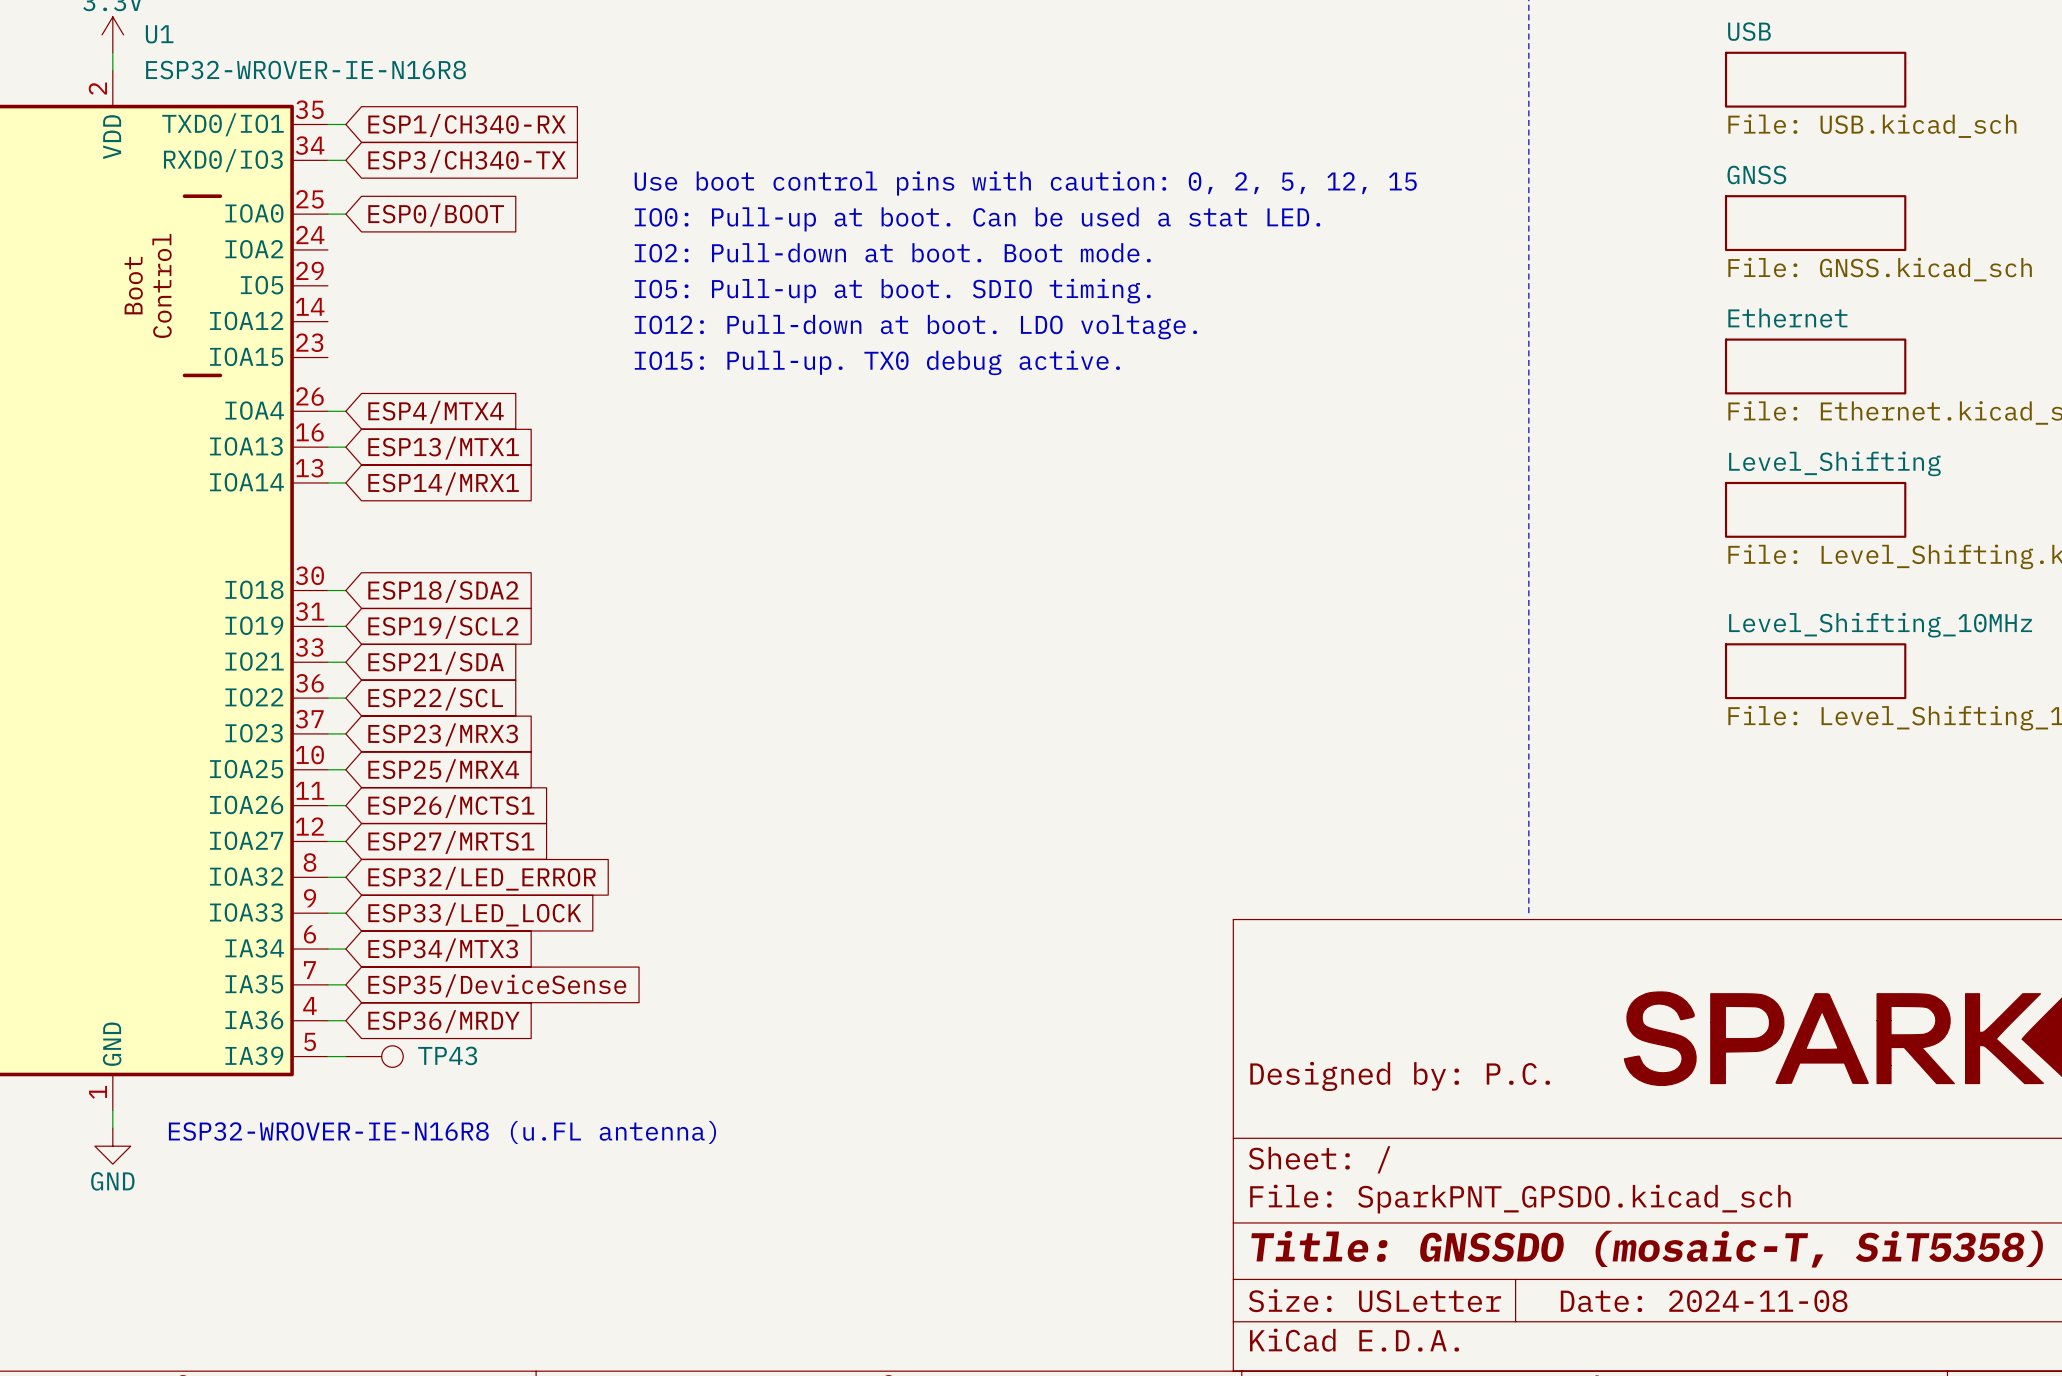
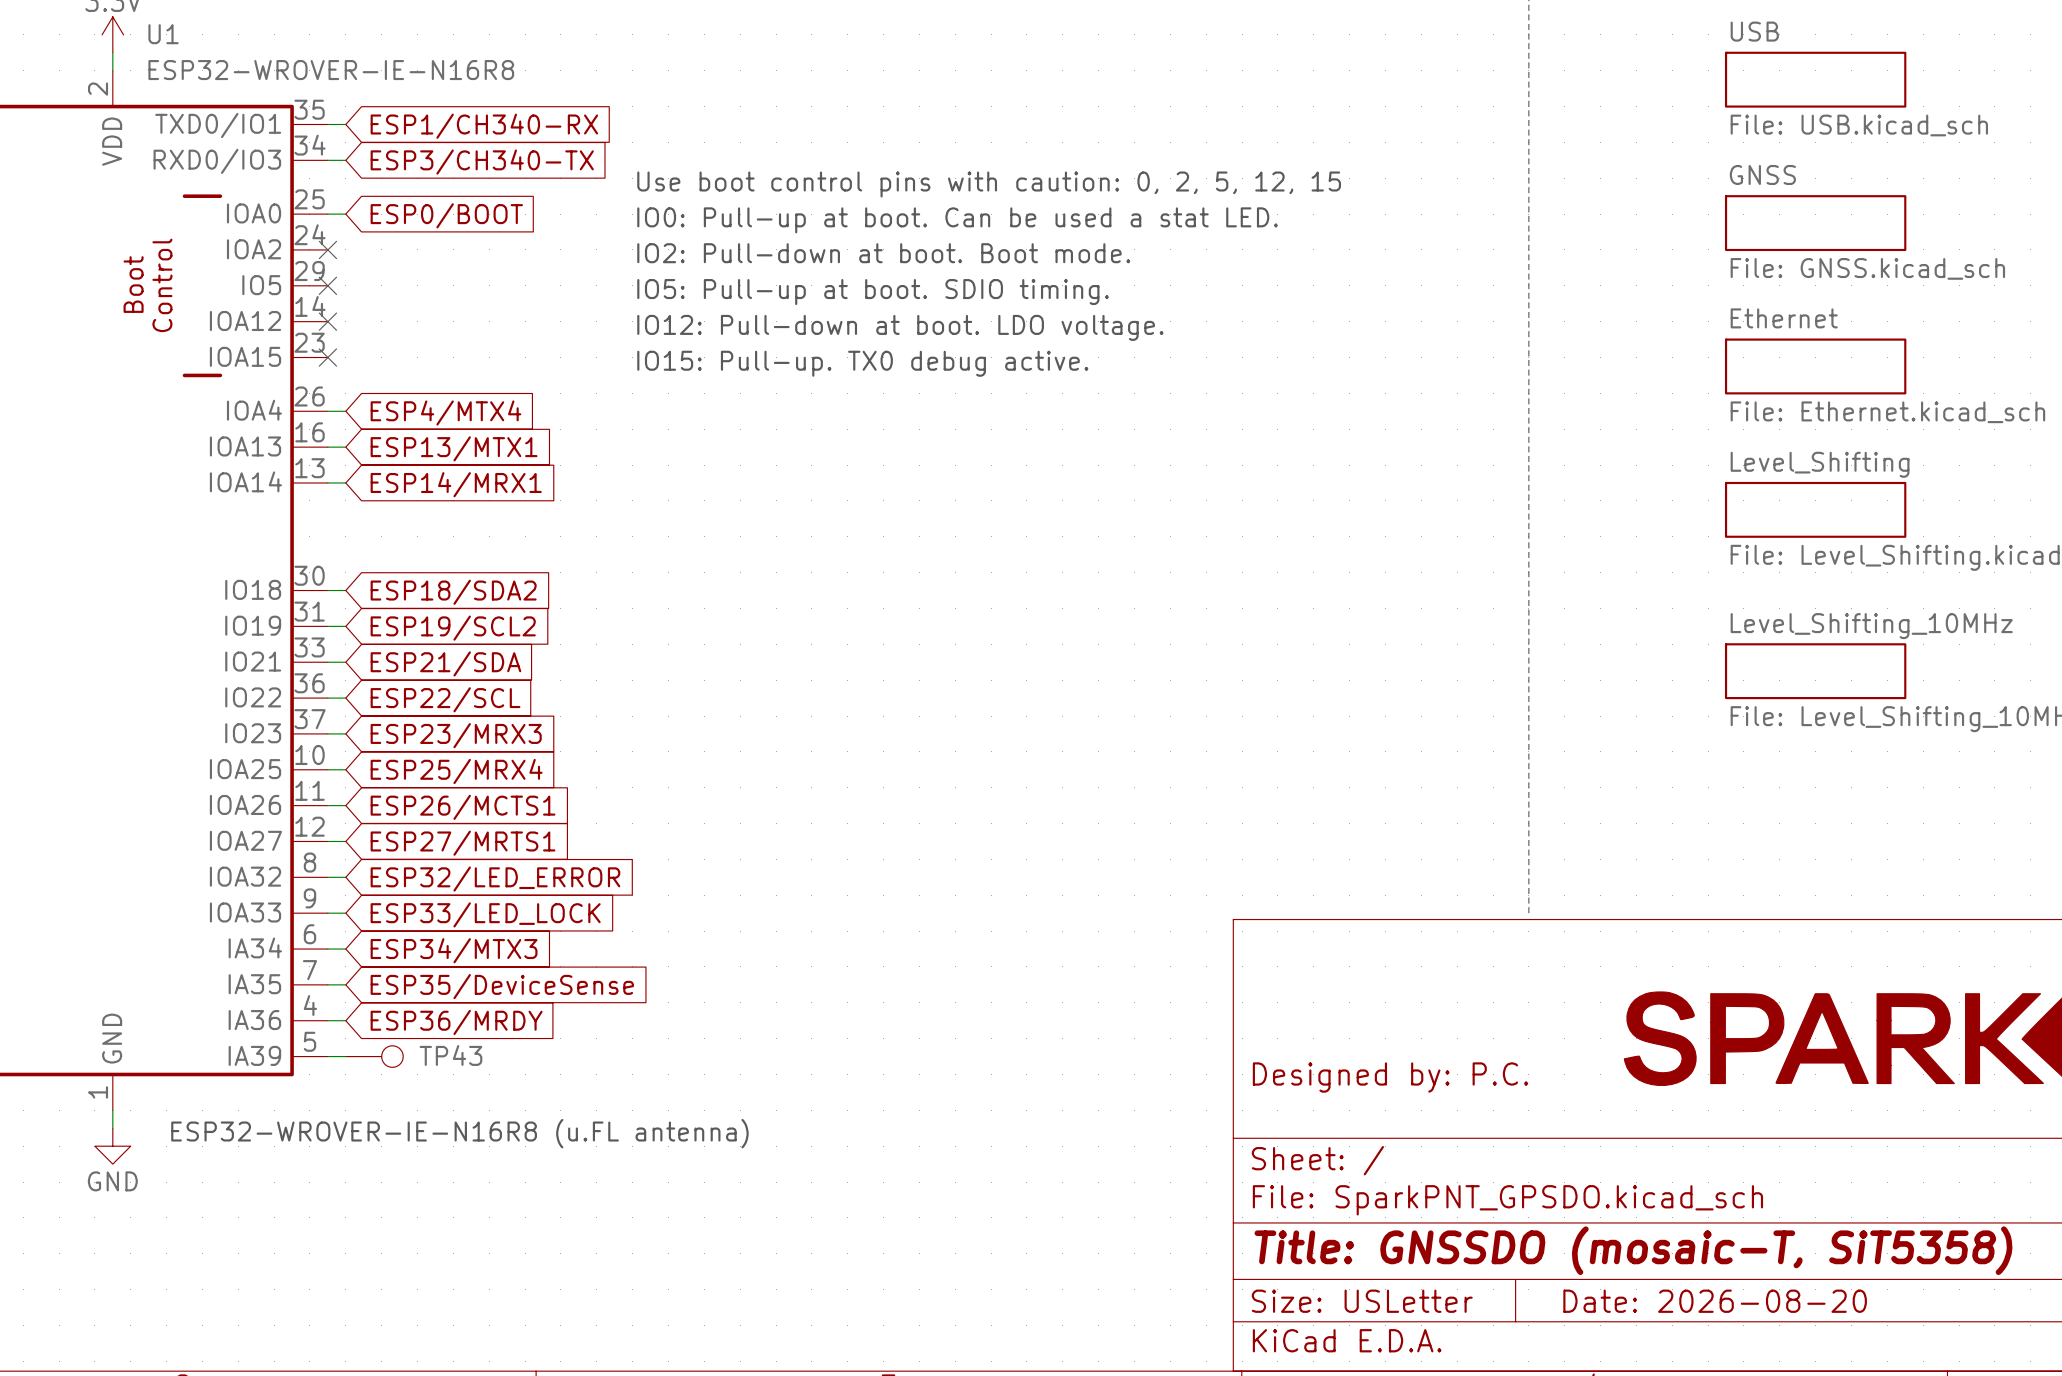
no-connect mark: none -> (327, 249)
no-connect mark: none -> (327, 285)
no-connect mark: none -> (327, 321)
no-connect mark: none -> (327, 357)
title block: Date: 2024-11-08 (1704, 1301) -> Date: 2026-08-20 (1715, 1301)

